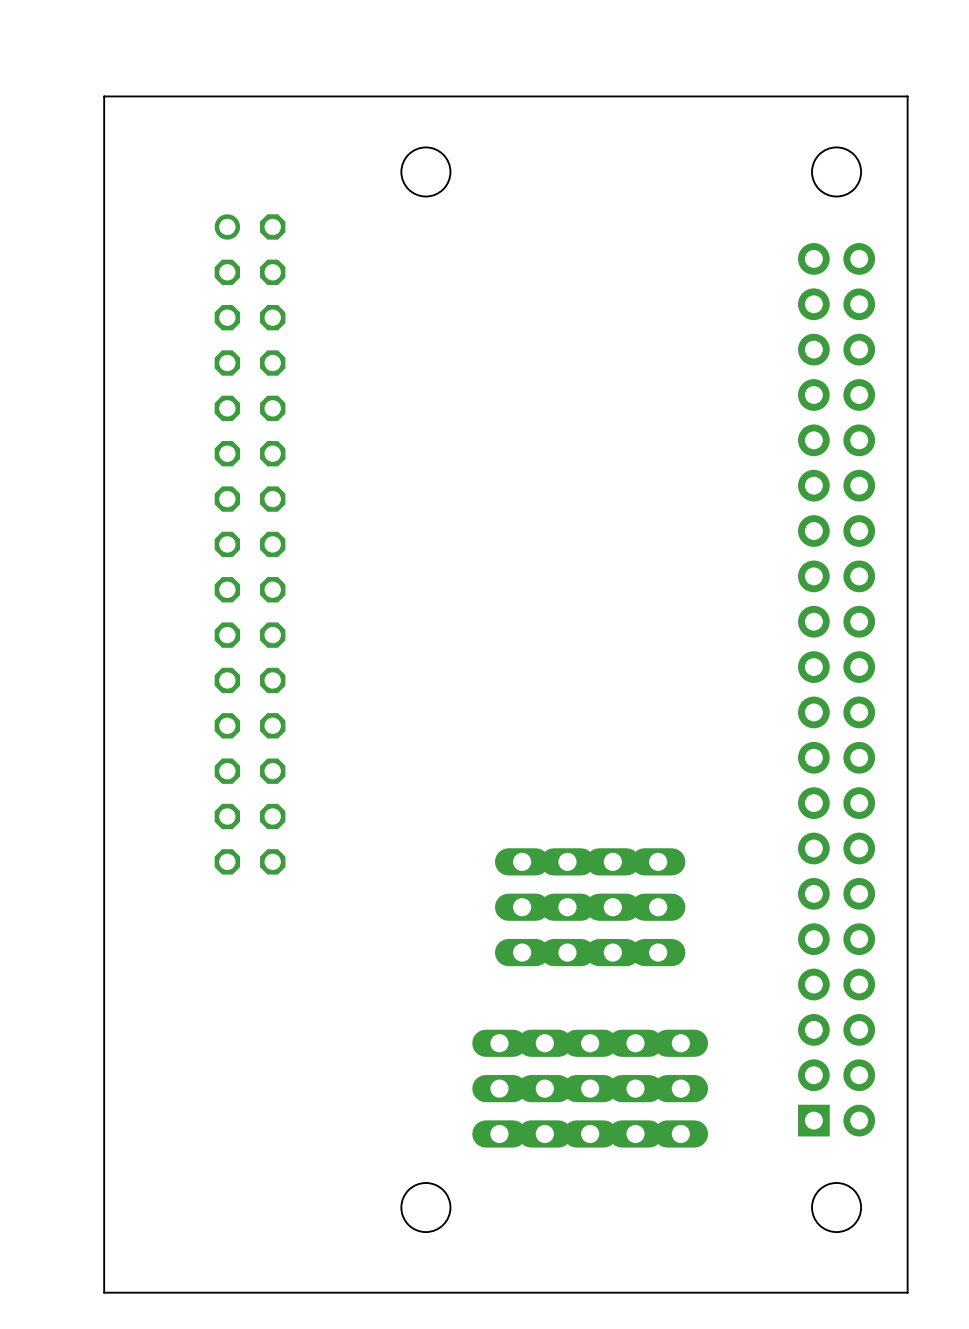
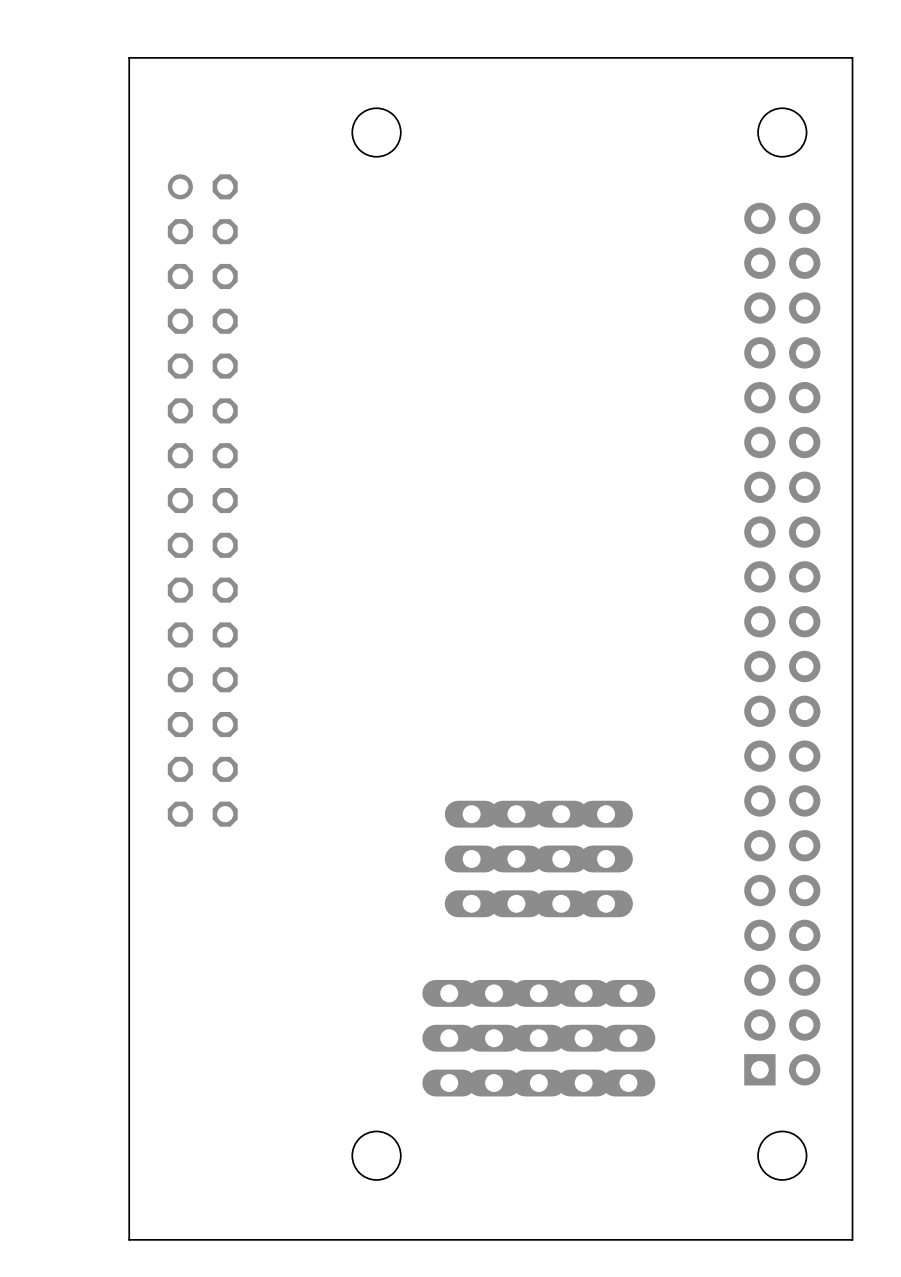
board edge: (175, 96) (104, 96) (104, 1292) (175, 1292) -> (129, 57) (129, 1239)

